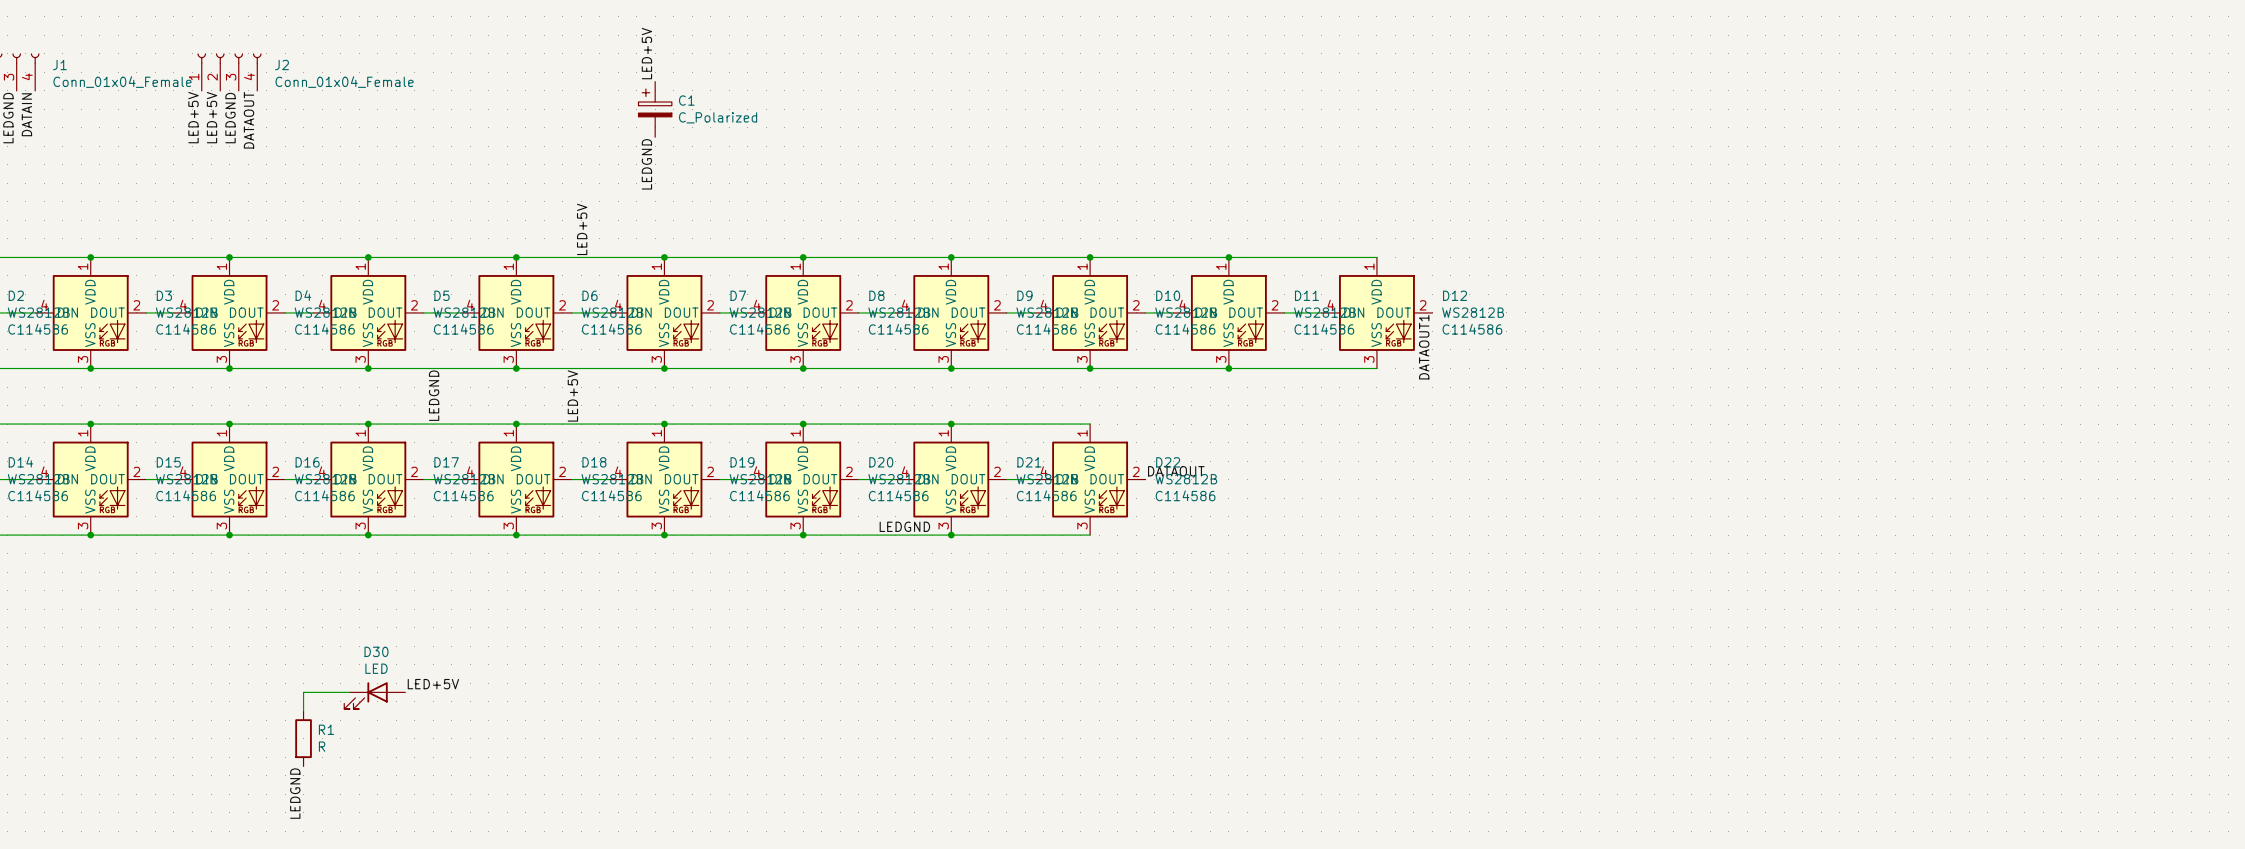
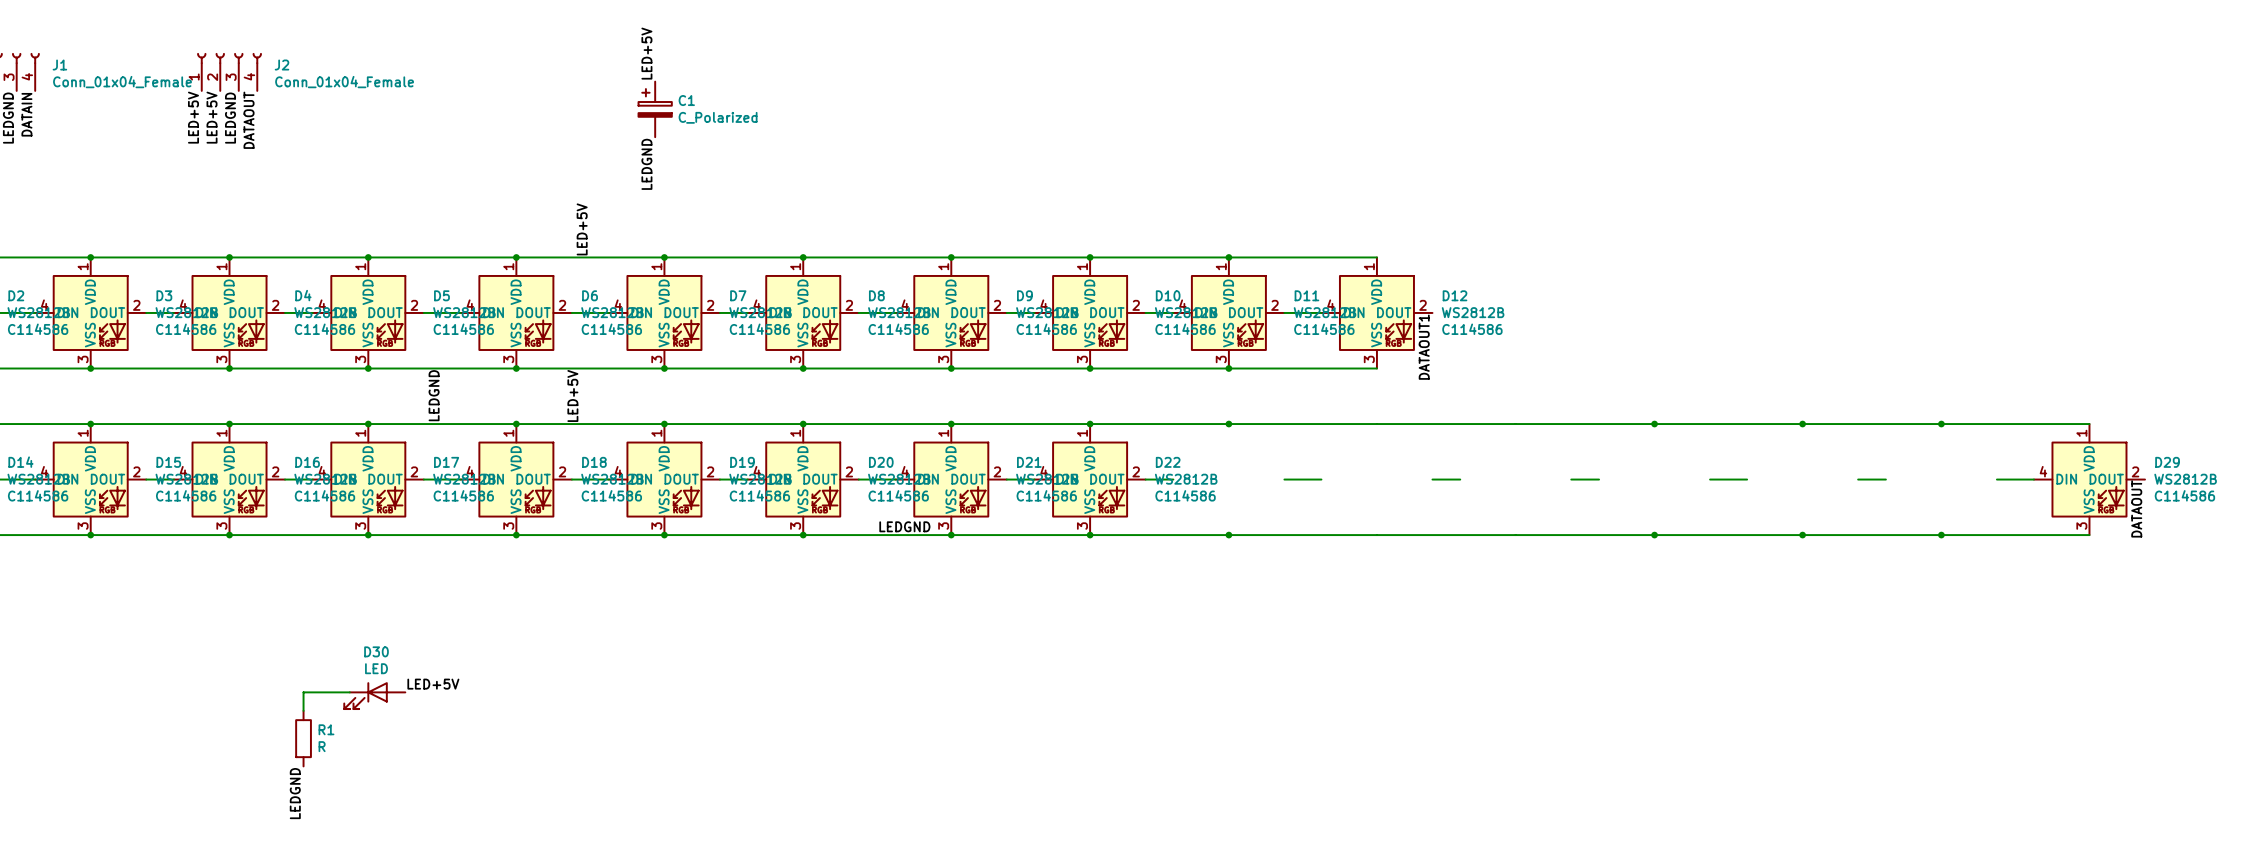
wire: none -> (1090, 424) (2089, 424)
junction: none -> (1090, 424)
junction: none -> (1228, 424)
junction: none -> (1654, 424)
junction: none -> (1802, 424)
junction: none -> (1941, 424)
label: DATAOUT (1176, 471) -> none
wire: none -> (1145, 479) (1173, 479)
wire: none -> (1284, 479) (1321, 479)
wire: none -> (1432, 479) (1460, 479)
wire: none -> (1571, 479) (1599, 479)
wire: none -> (1710, 479) (1747, 479)
wire: none -> (1858, 479) (1885, 479)
wire: none -> (1996, 479) (2033, 479)
D29: none -> WS2812B (2089, 479)
label: none -> DATAOUT (2136, 508)
wire: none -> (1090, 535) (2089, 535)
junction: none -> (1090, 535)
junction: none -> (1228, 535)
junction: none -> (1654, 535)
junction: none -> (1802, 535)
junction: none -> (1941, 535)

